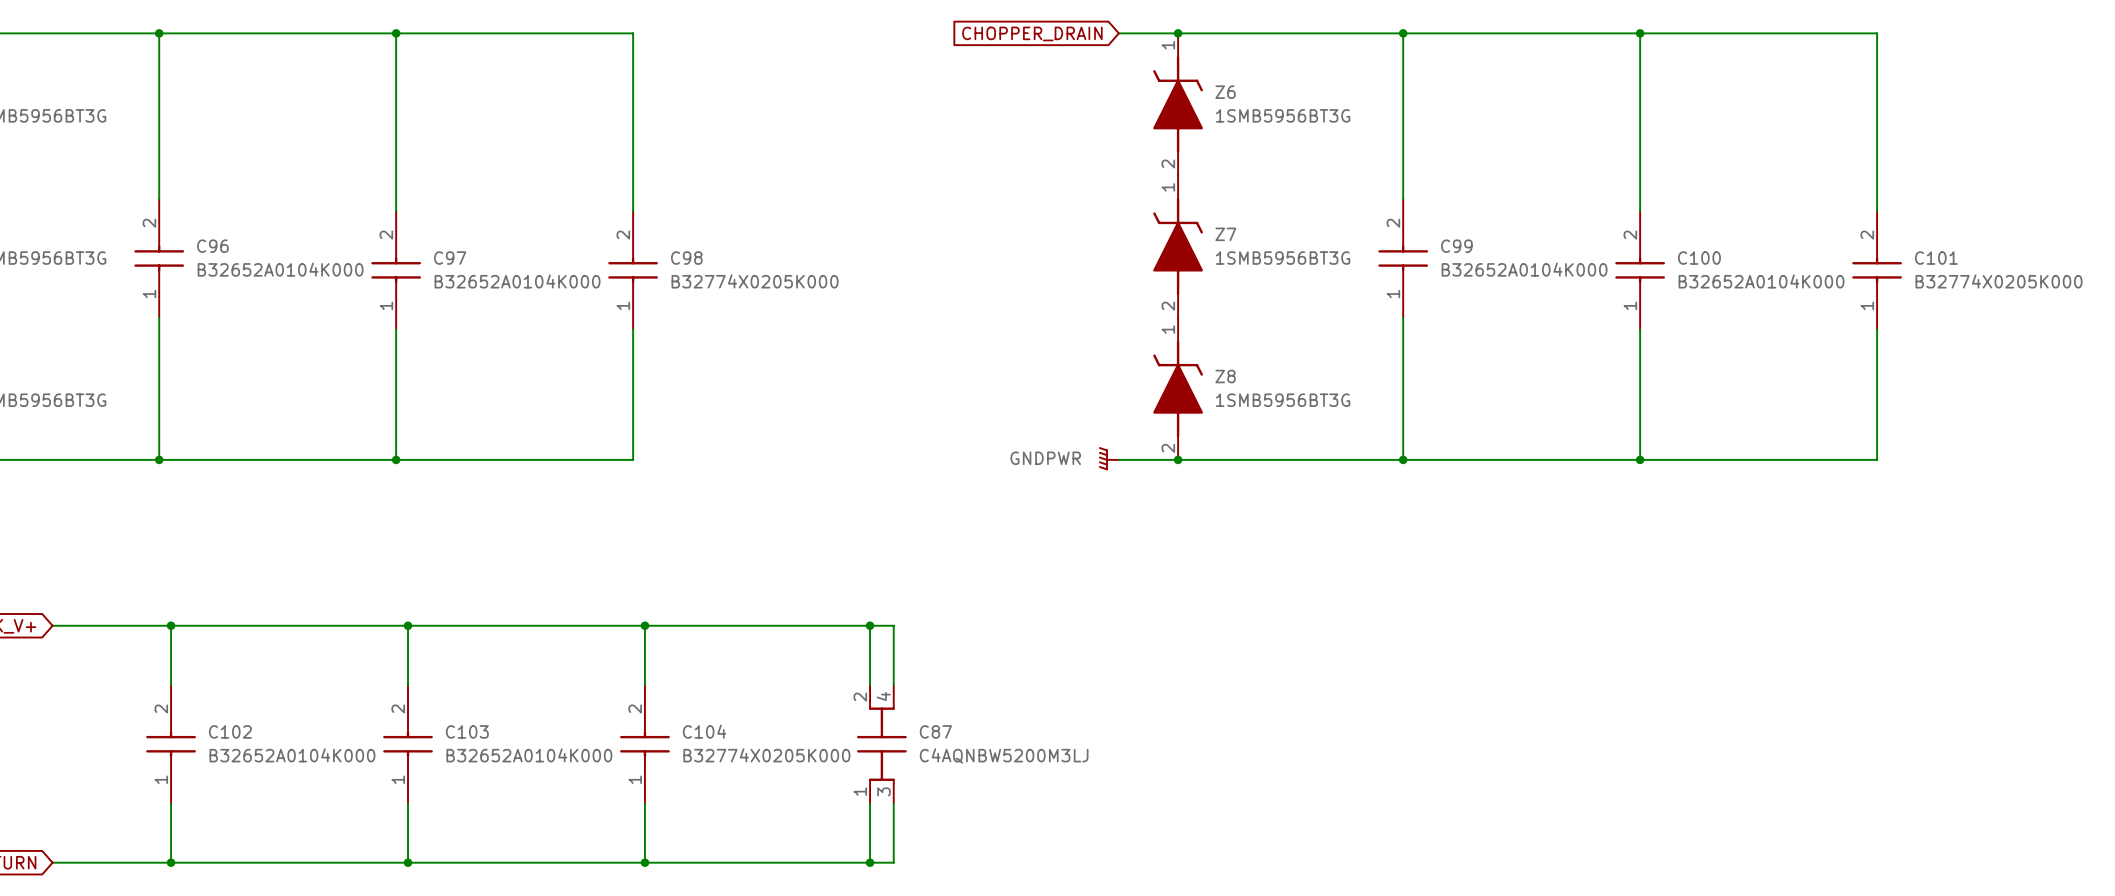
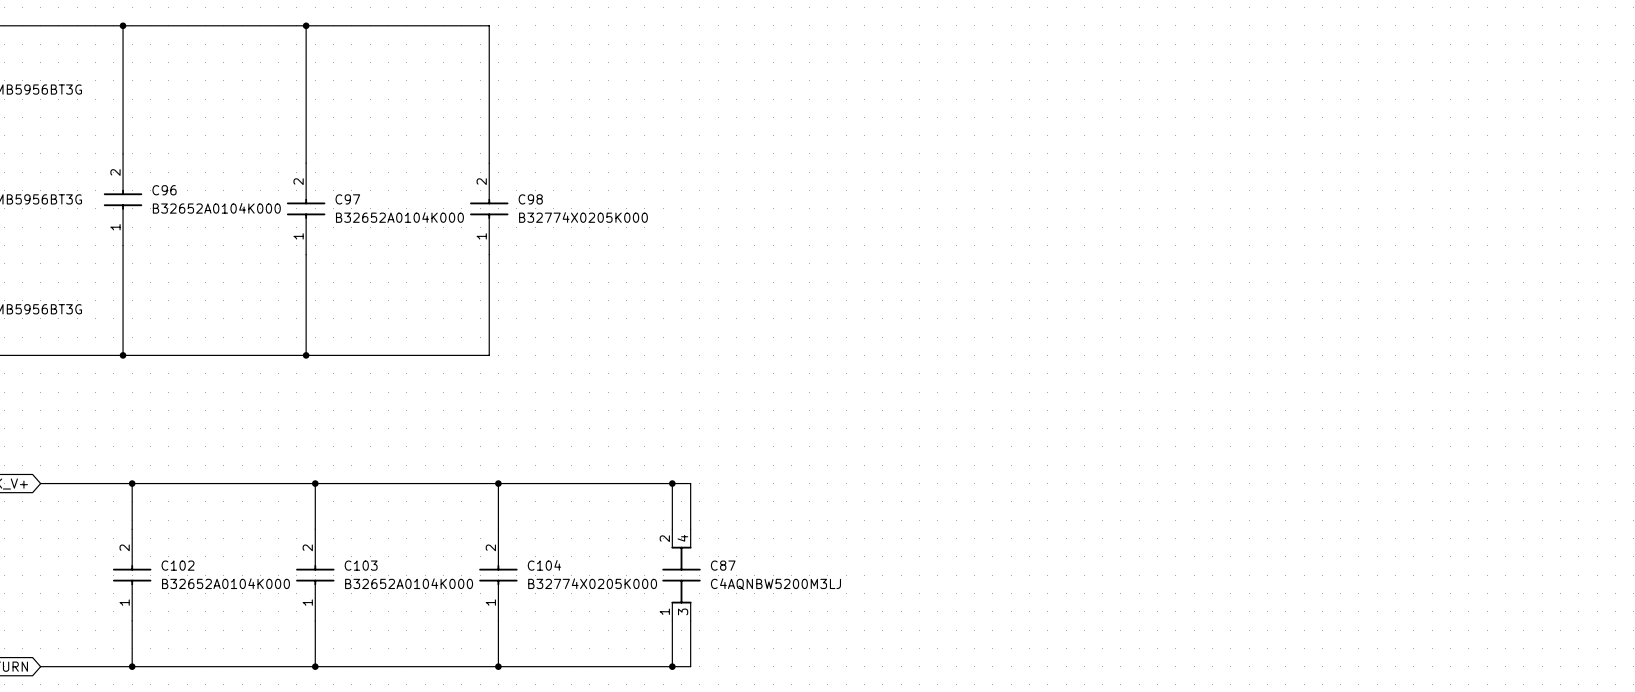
global label: CHOPPER_DRAIN (1032, 33) -> none
wire: (1118, 33) (1877, 33) (1877, 211) -> none
junction: (1178, 33) -> none
wire: (1403, 33) (1403, 199) -> none
junction: (1403, 33) -> none
wire: (1640, 33) (1640, 211) -> none
junction: (1640, 33) -> none
Z6: 1SMB5956BT3G (1178, 104) -> none
Z7: 1SMB5956BT3G (1178, 246) -> none
C99: B32652A0104K000 (1403, 258) -> none
C100: B32652A0104K000 (1640, 270) -> none
C101: B32774X0205K000 (1877, 270) -> none
wire: (1403, 317) (1403, 459) -> none
wire: (1640, 329) (1640, 459) -> none
wire: (1877, 329) (1877, 459) (1118, 459) -> none
Z8: 1SMB5956BT3G (1178, 388) -> none
power symbol: GNDPWR (1108, 458) -> none
junction: (1178, 459) -> none
junction: (1403, 459) -> none
junction: (1640, 459) -> none

